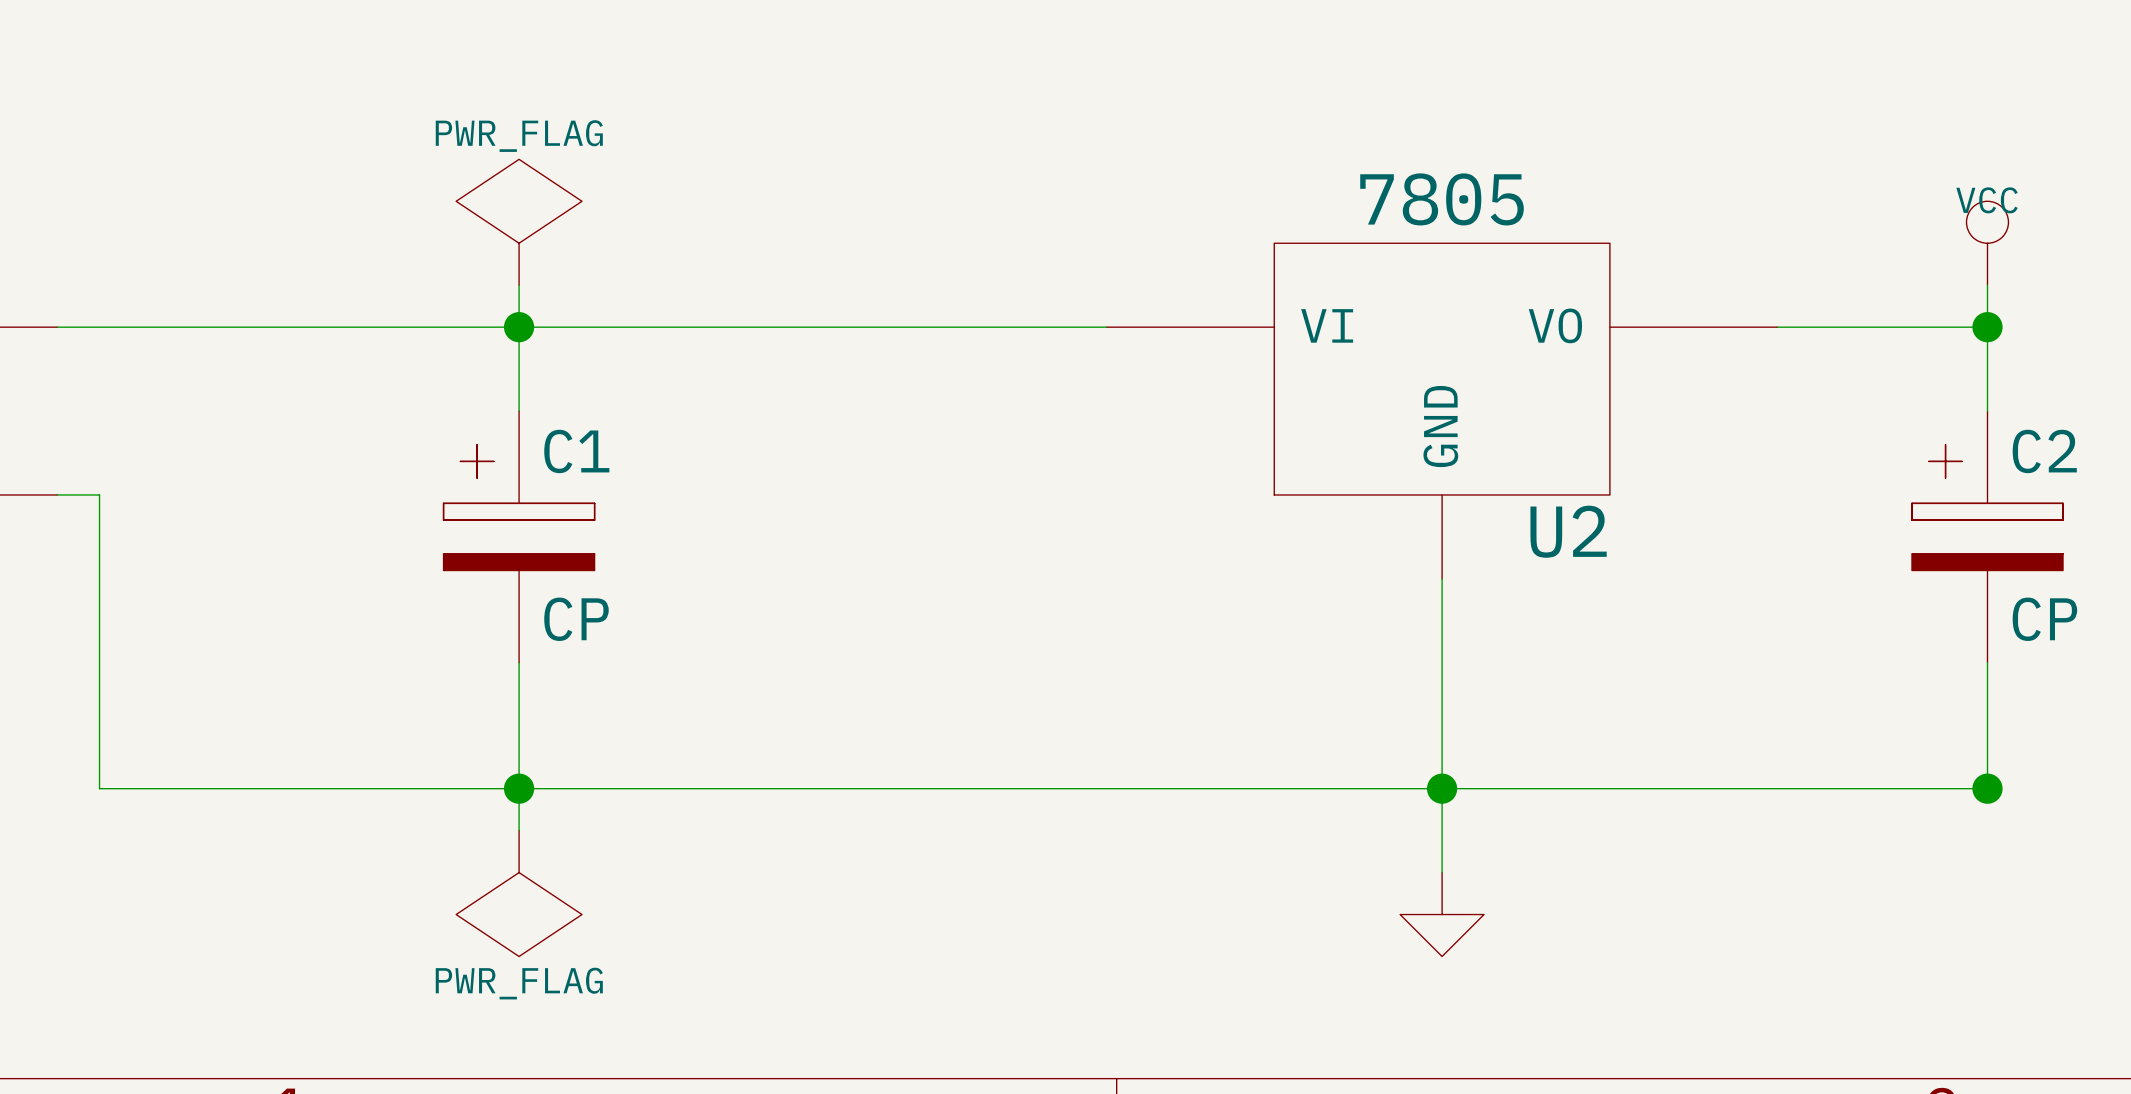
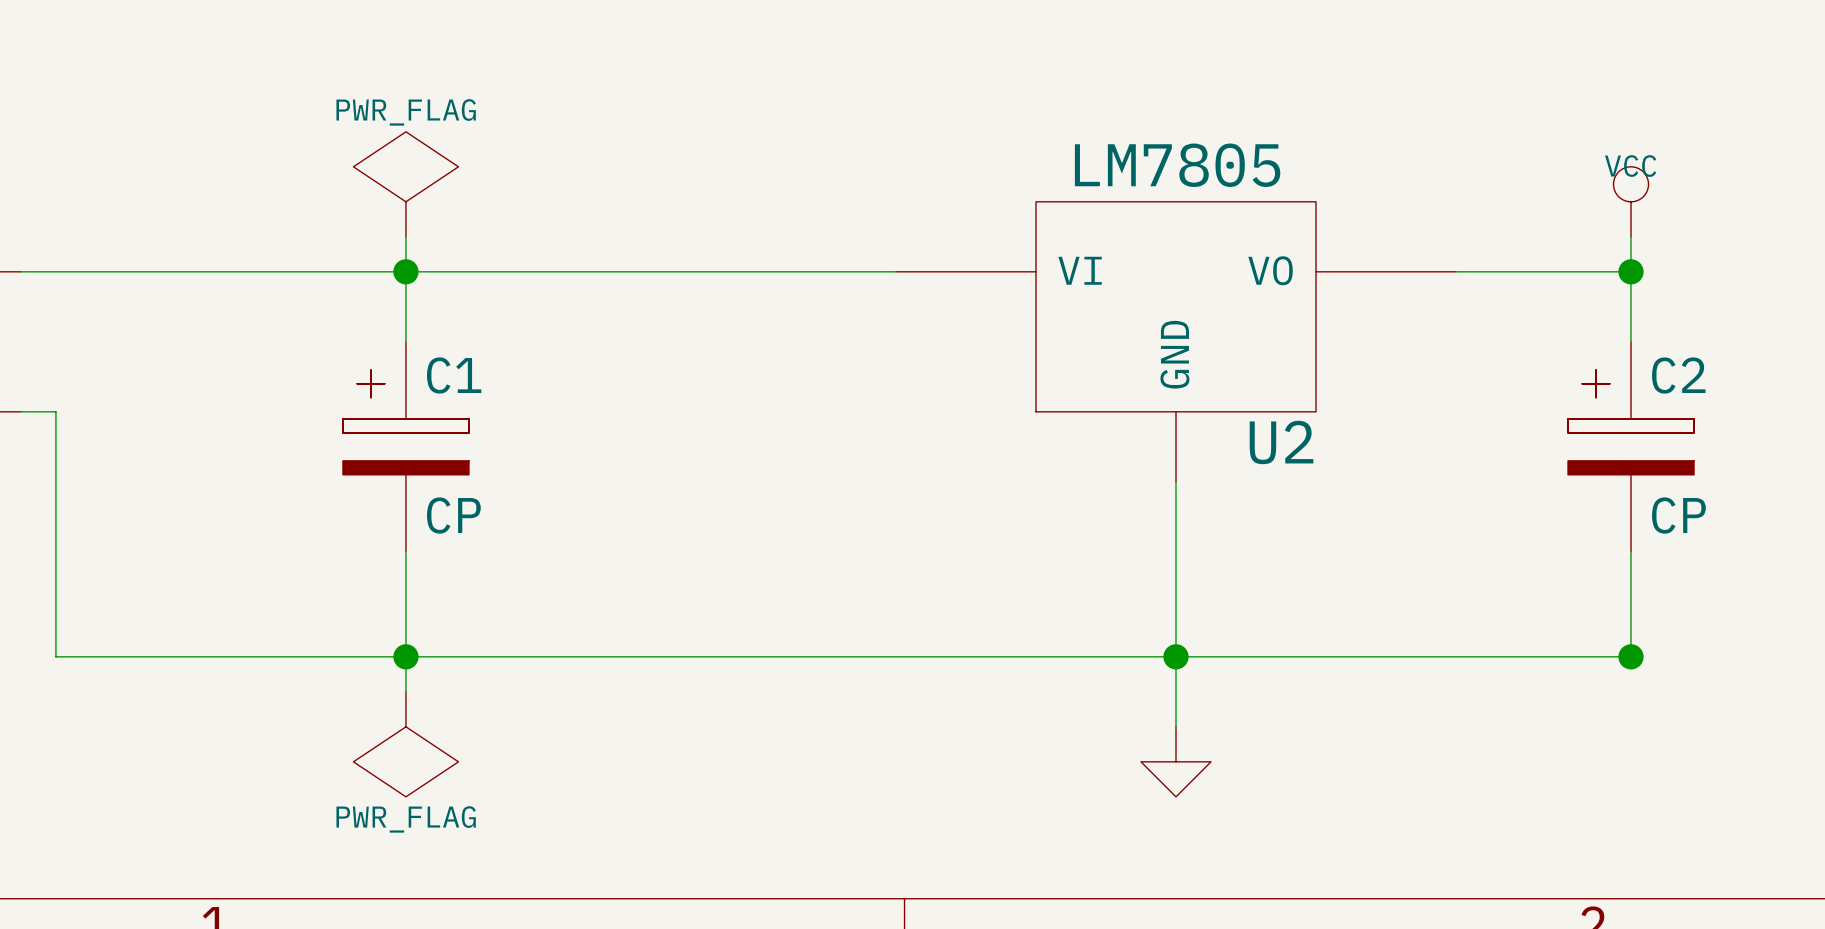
U2 value: 7805 (1442, 199) -> LM7805 (1177, 165)

